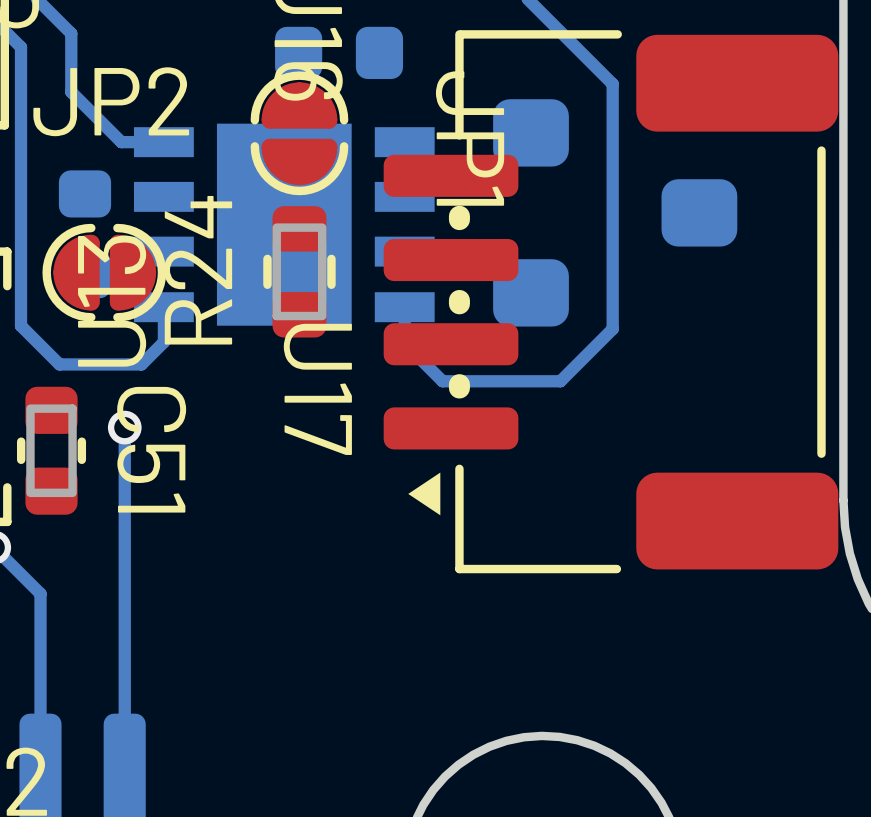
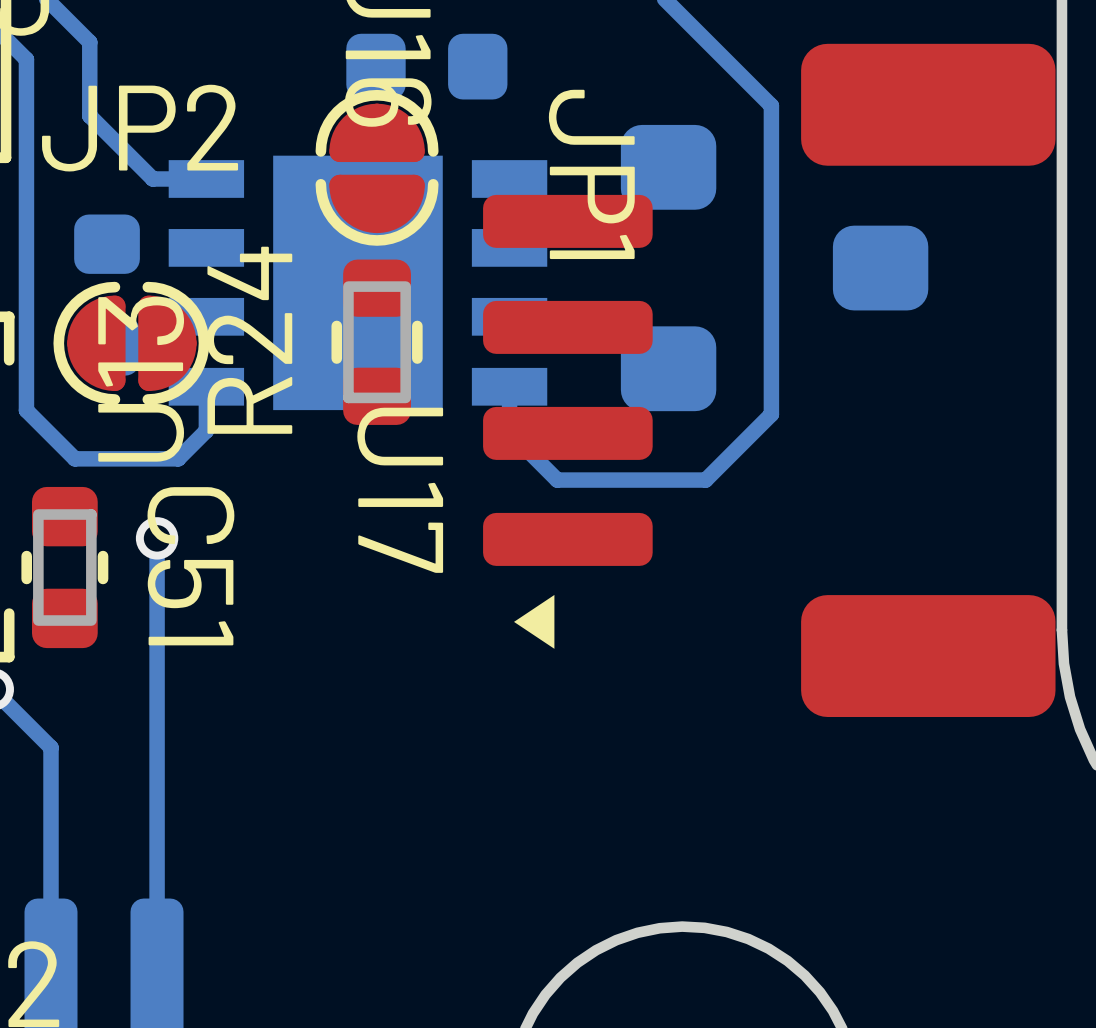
U13 footprint: [383, 30, 839, 574] -> [483, 43, 1056, 717]

